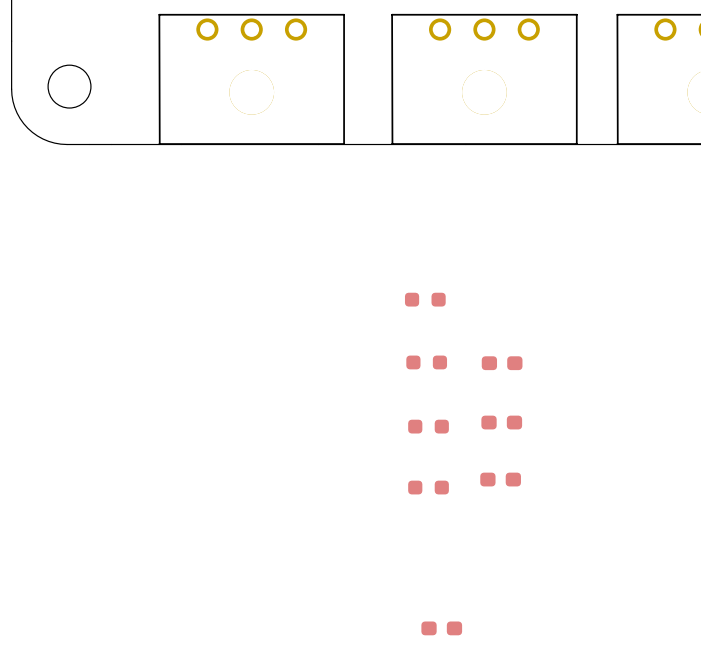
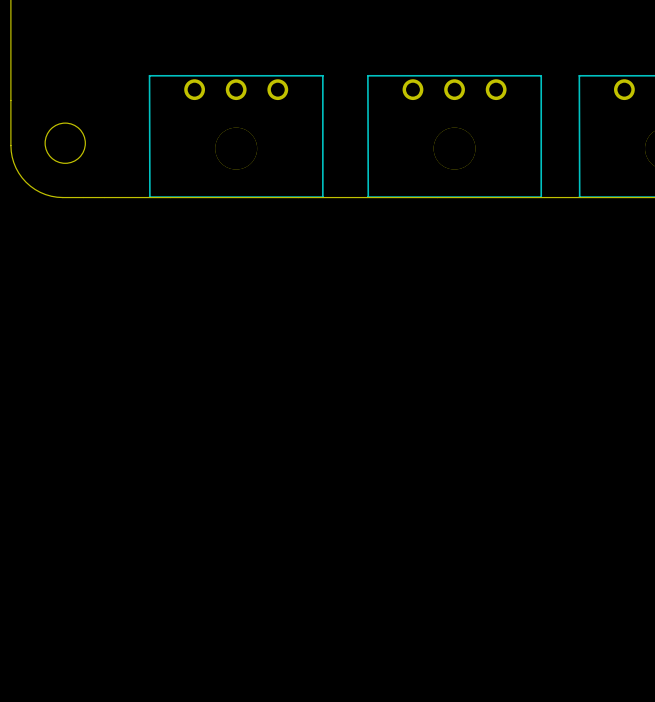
part: (425, 299) -> none
part: (426, 362) -> none
part: (502, 363) -> none
part: (501, 422) -> none
part: (428, 426) -> none
part: (500, 479) -> none
part: (428, 487) -> none
part: (441, 628) -> none

